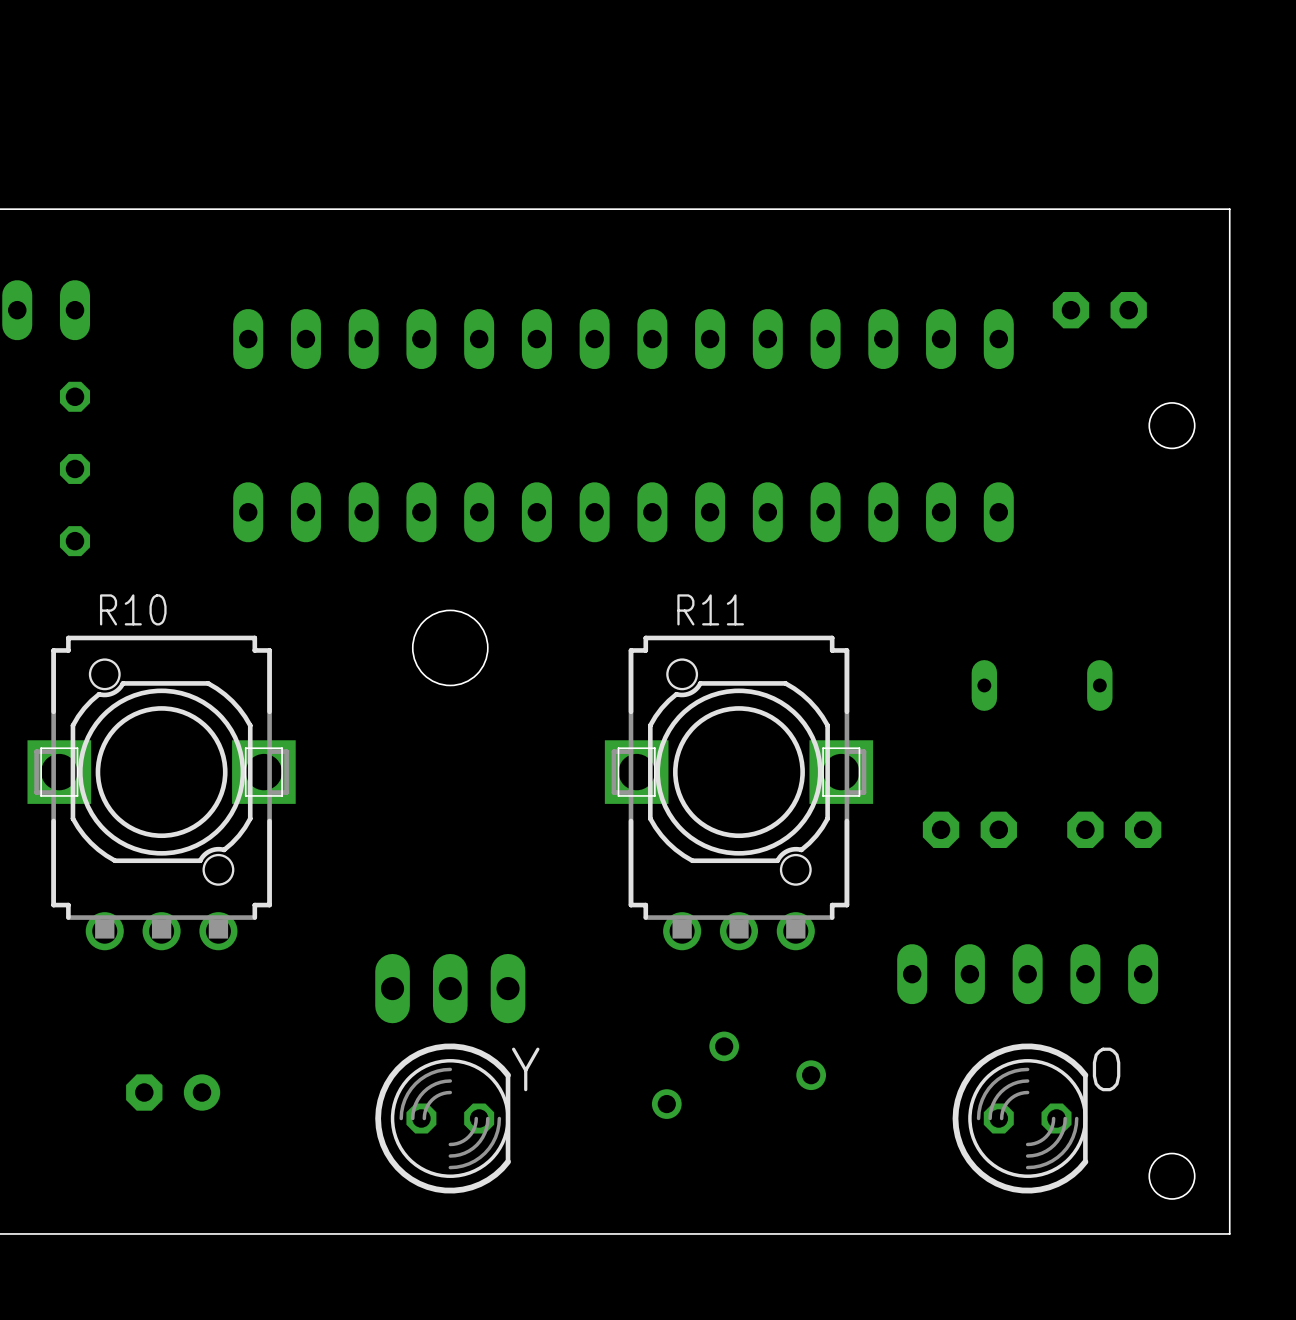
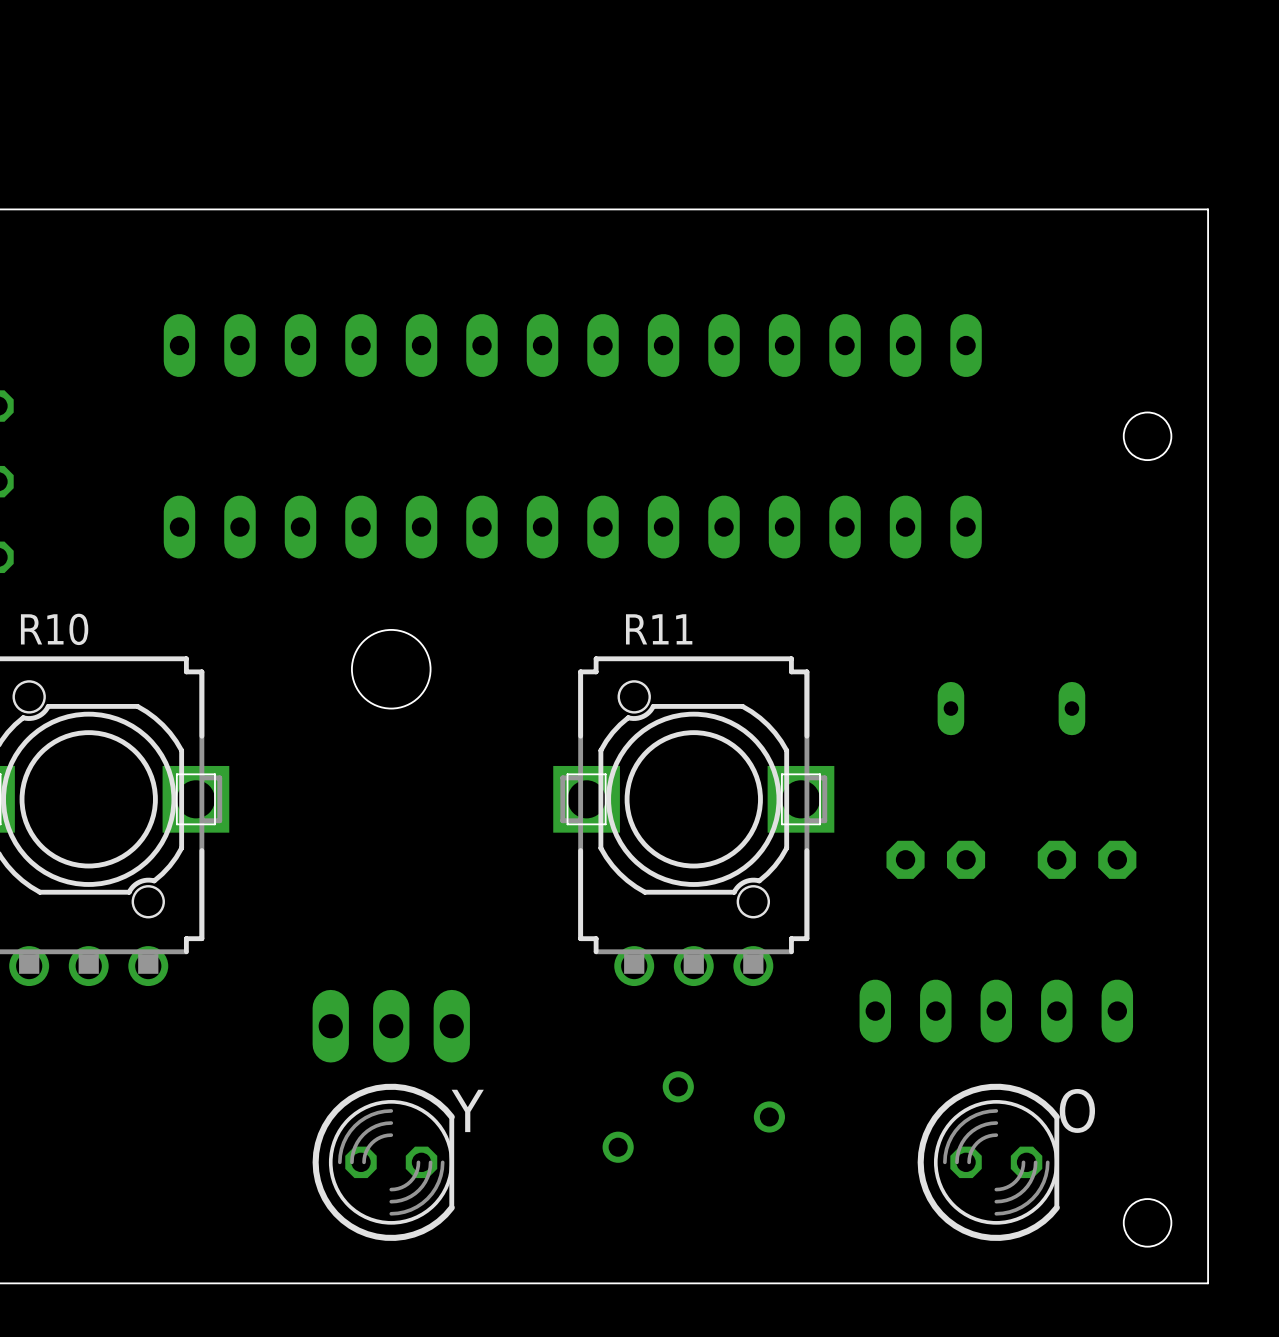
part: (1099, 310) -> none
part: (173, 1092) -> none

